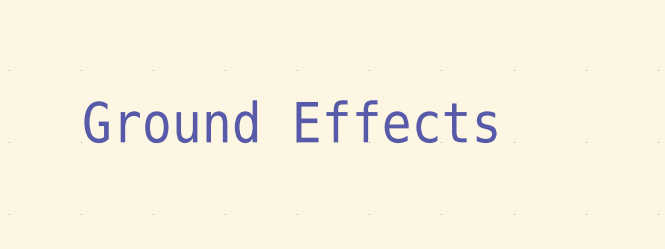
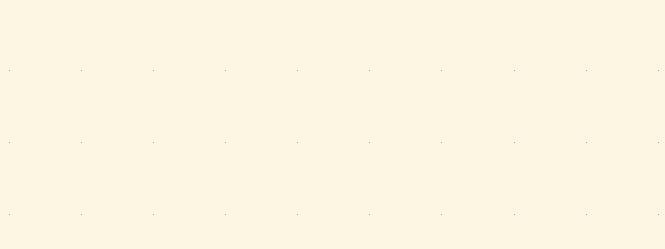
text: Ground Effects (290, 121) -> none

